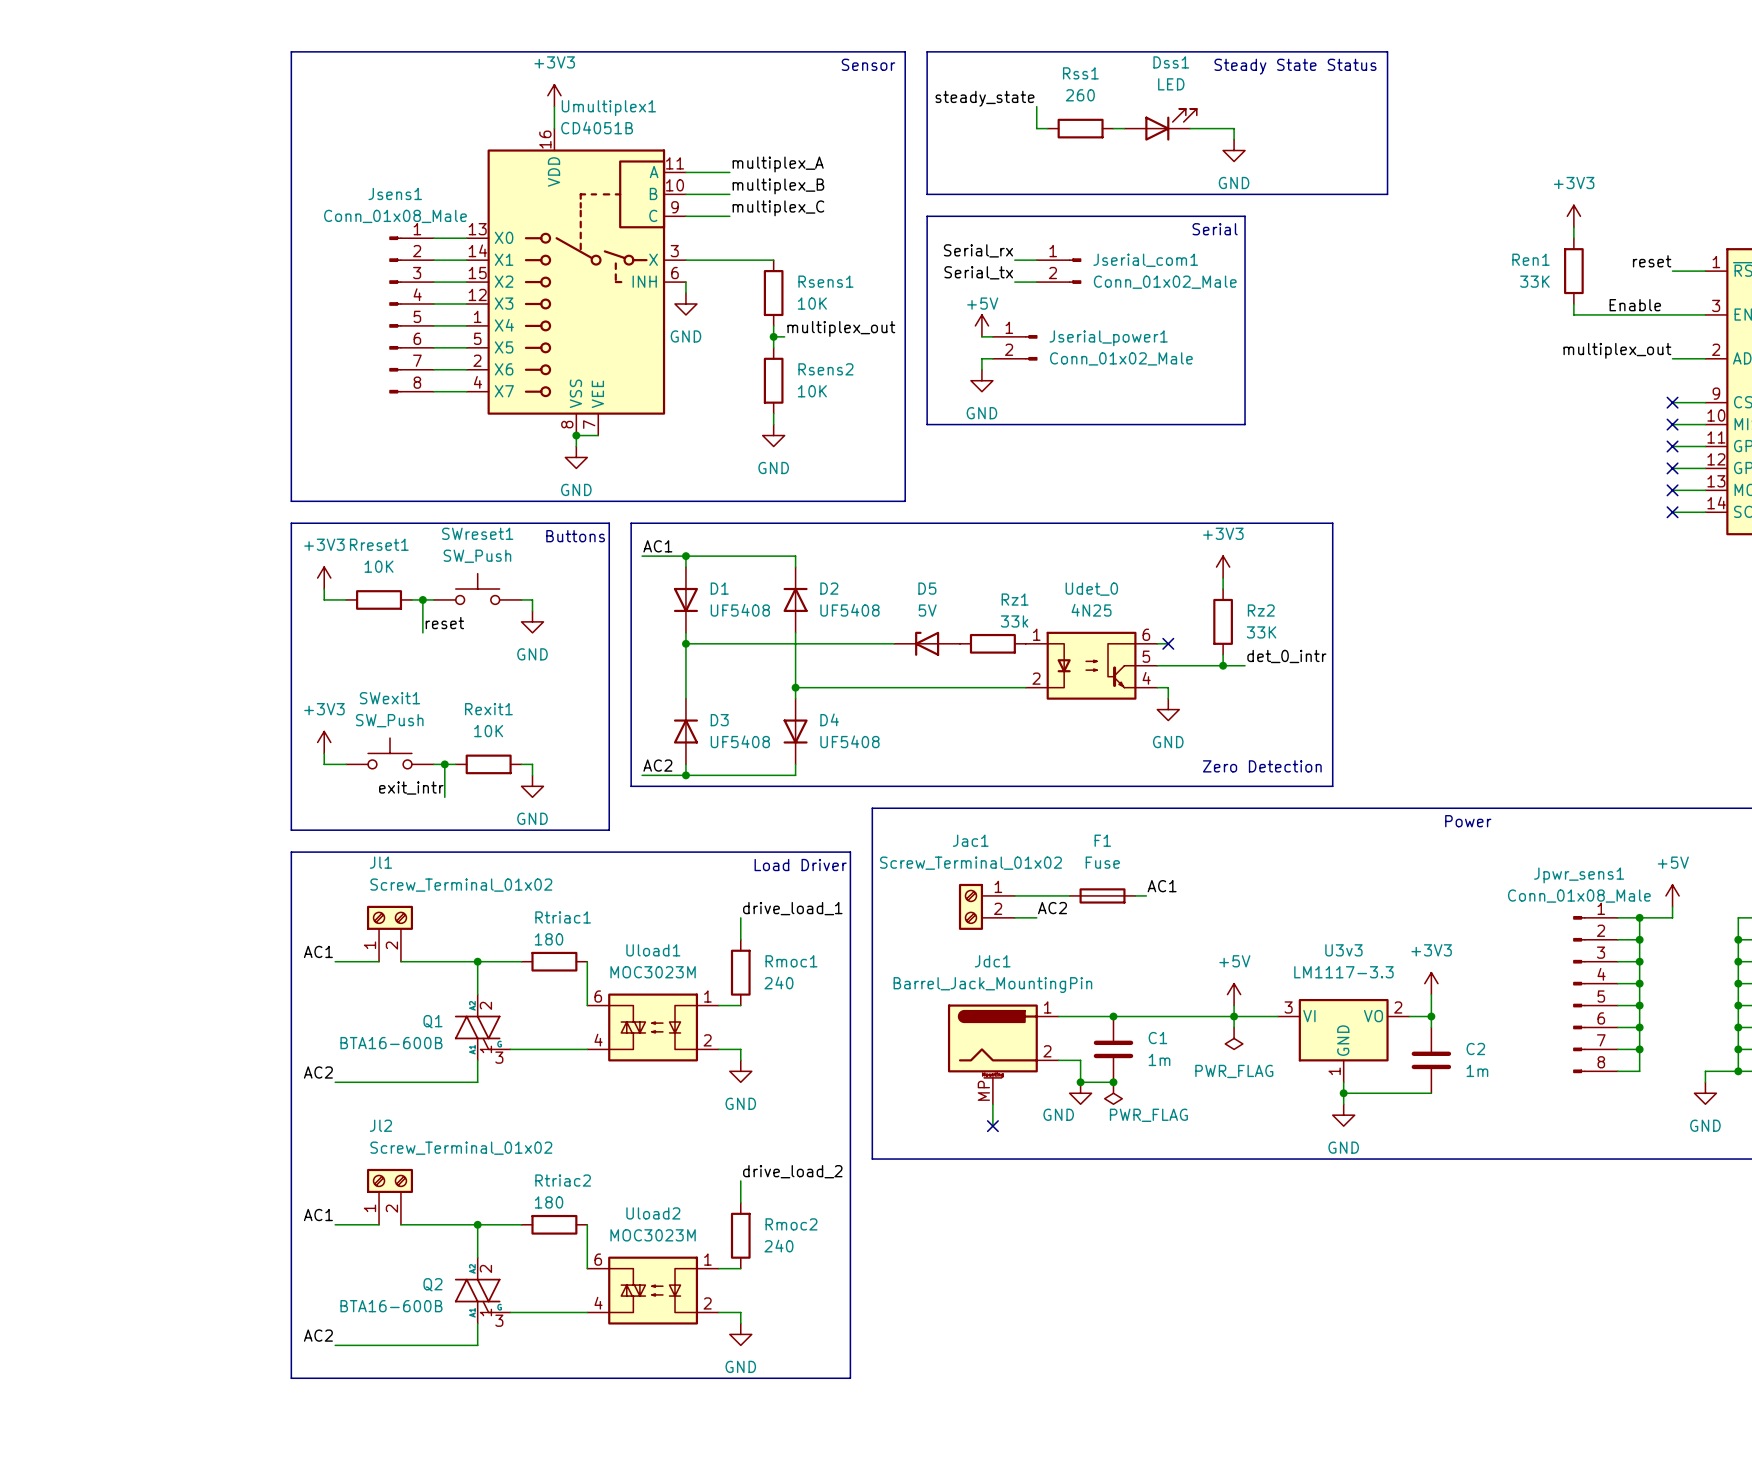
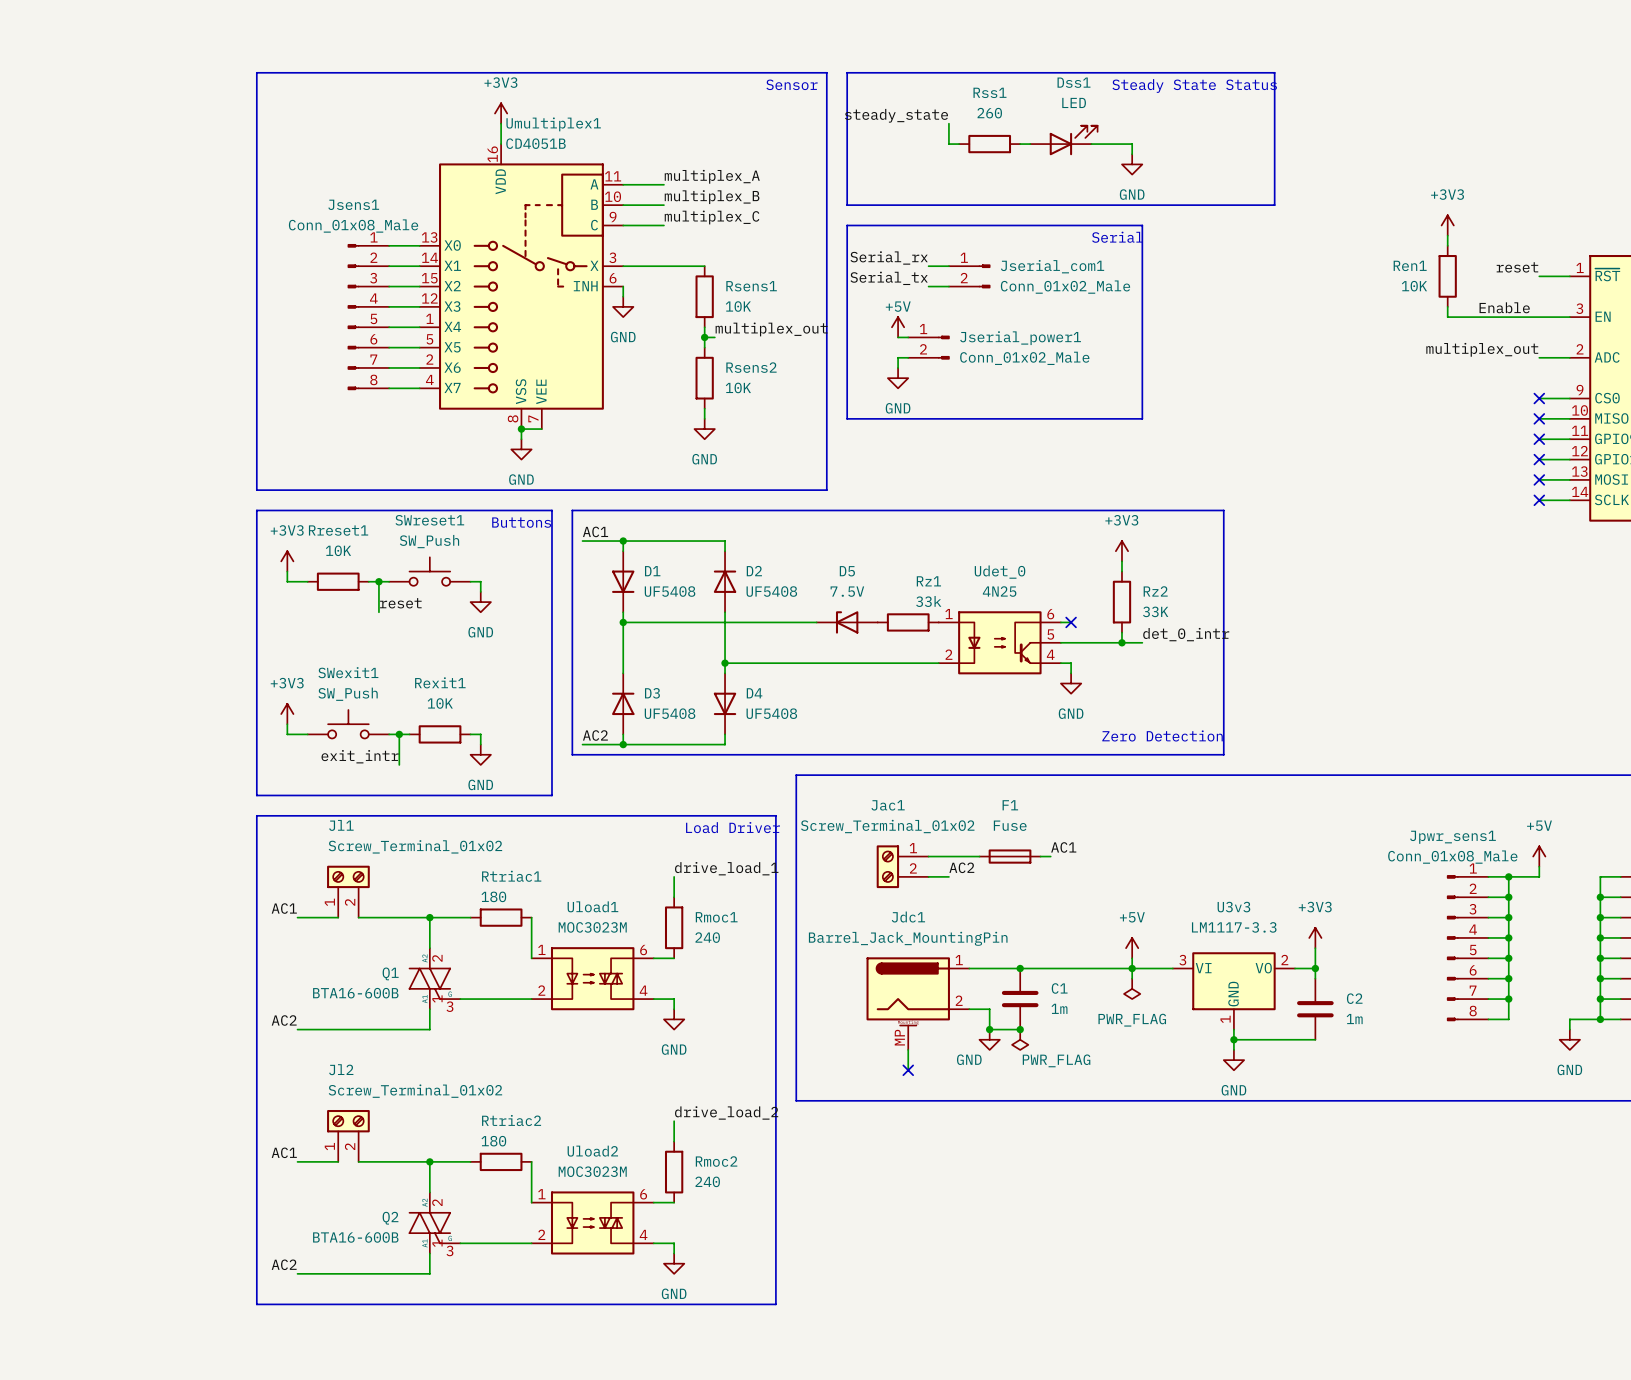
Ren1 value: 33K (1534, 281) -> 10K (1414, 286)
D5 value: 5V (927, 610) -> 7.5V (847, 591)
text: Power (1468, 821) -> none
Uload1 flip: as is (653, 1027) -> left-right (592, 978)
Uload2 flip: as is (653, 1290) -> left-right (592, 1222)

